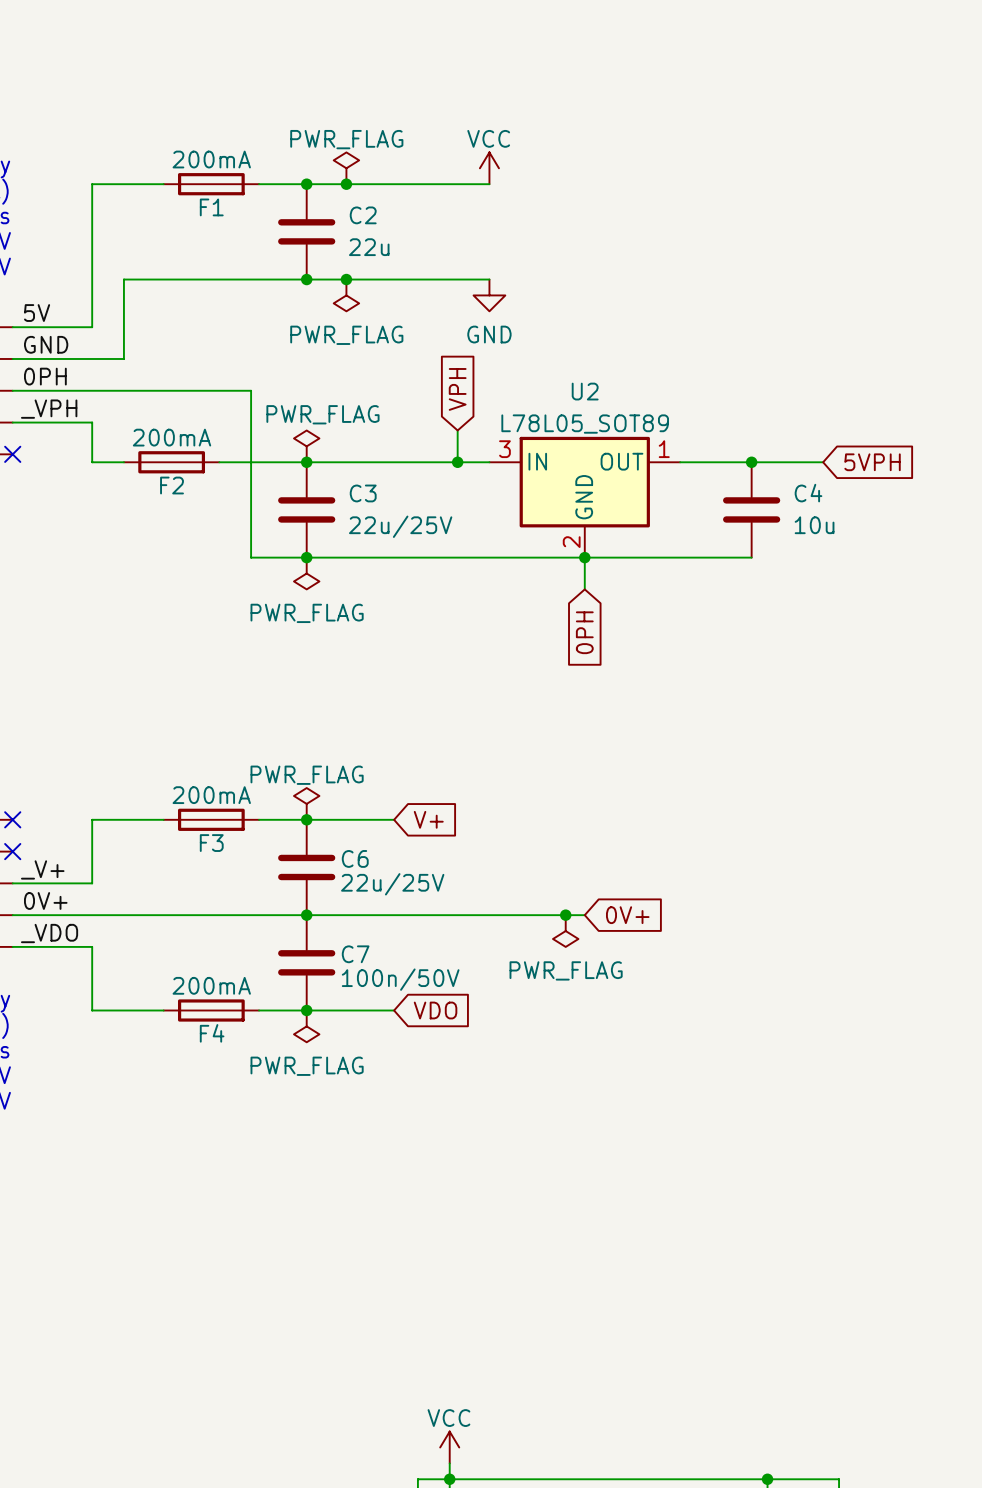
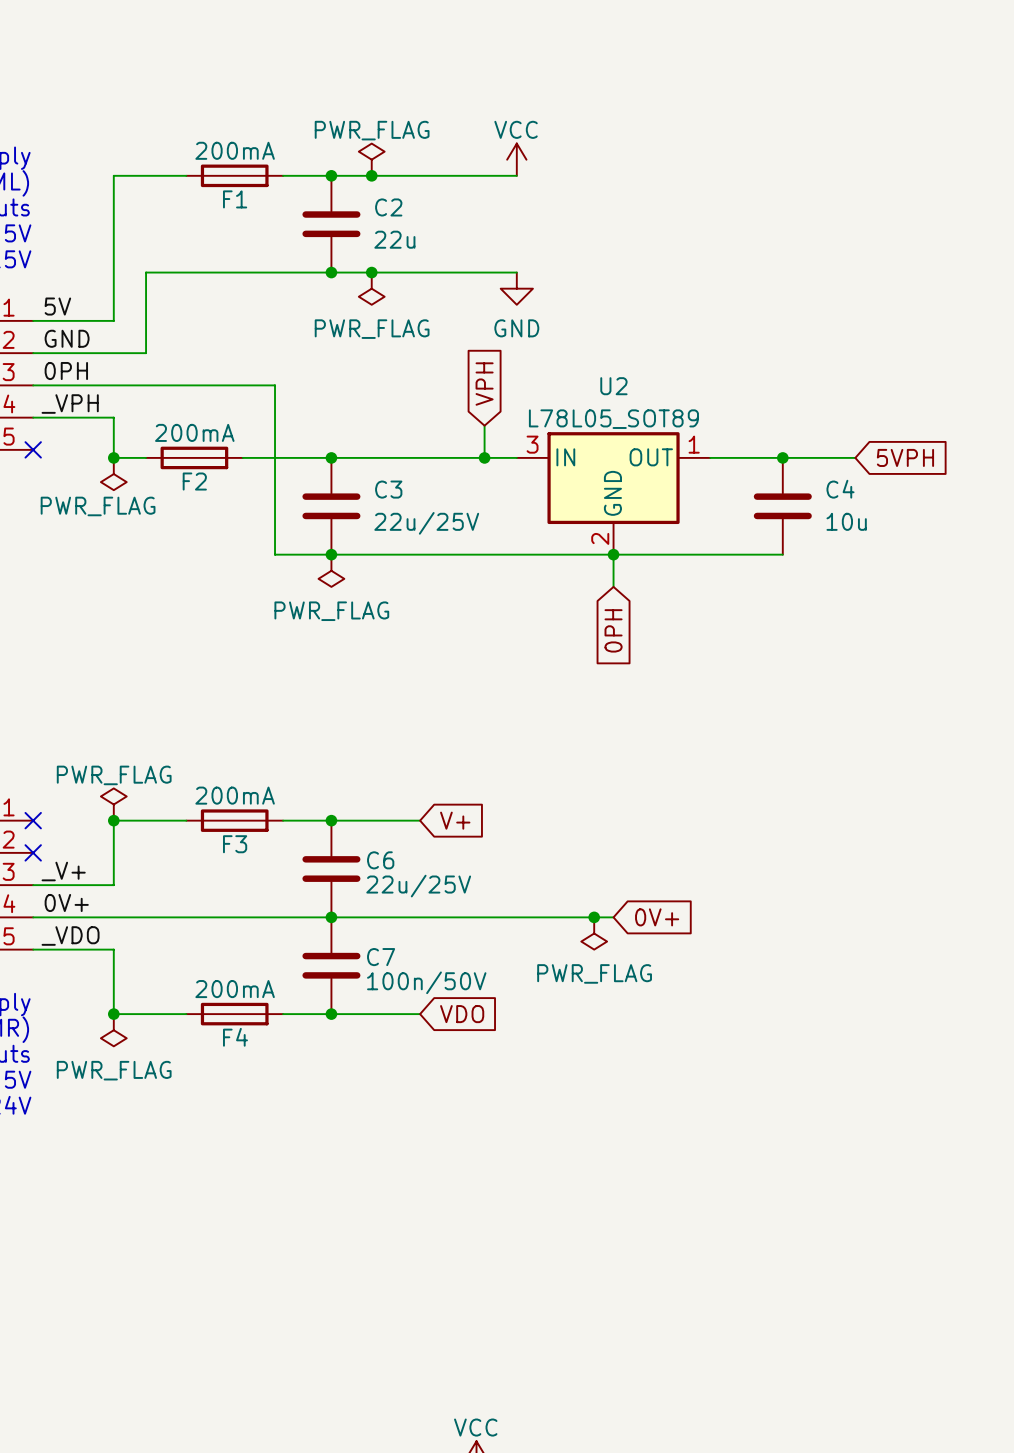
power symbol: PWR_FLAG (306, 446) -> none
junction: none -> (113, 457)
power symbol: none -> PWR_FLAG (113, 474)
power symbol: none -> PWR_FLAG (113, 804)
power symbol: PWR_FLAG (306, 803) -> none
junction: none -> (113, 820)
junction: none -> (113, 1014)
power symbol: none -> PWR_FLAG (113, 1030)
power symbol: PWR_FLAG (306, 1026) -> none

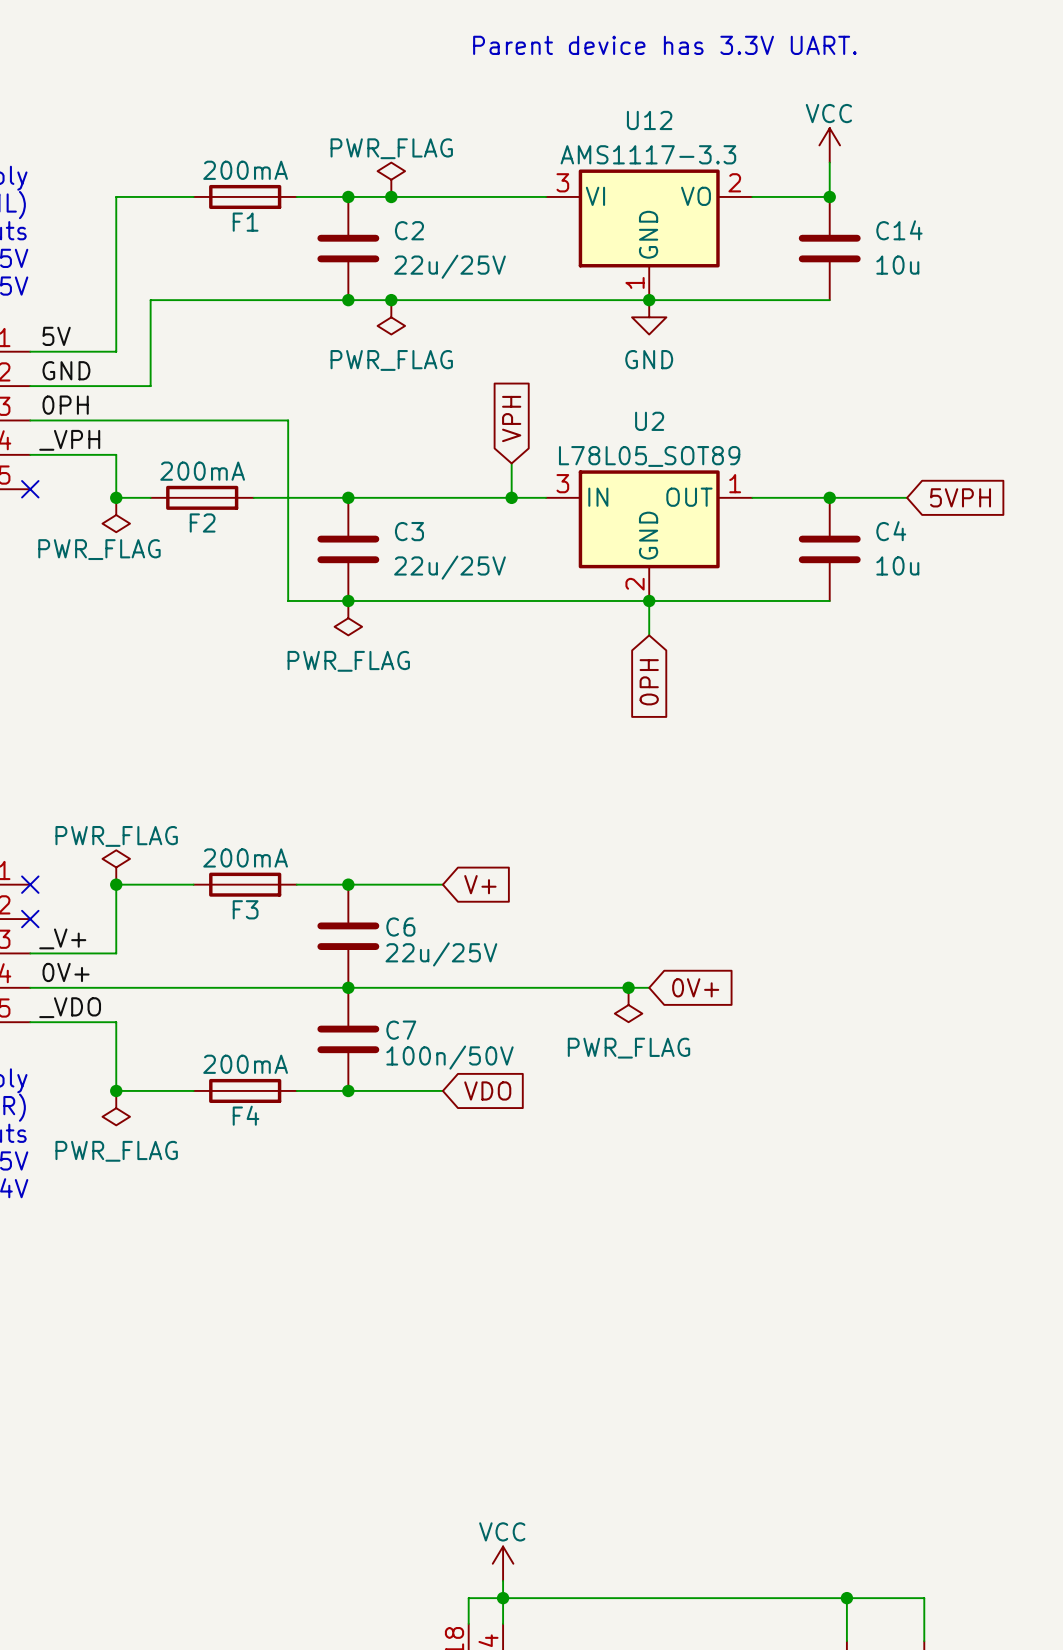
text: none -> Parent device has 3.3V UART. (664, 45)
wire: none -> (829, 162) (829, 196) (752, 196)
power symbol position: VCC (516, 159) -> VCC (829, 145)
junction: none -> (829, 196)
U12: none -> AMS1117-3.3 (649, 234)
C14: none -> 10u (829, 248)
C2 value: 22u (394, 239) -> 22u/25V (449, 266)
wire: none -> (546, 300) (829, 300)
junction: none -> (649, 300)
power symbol position: GND (516, 288) -> GND (649, 317)

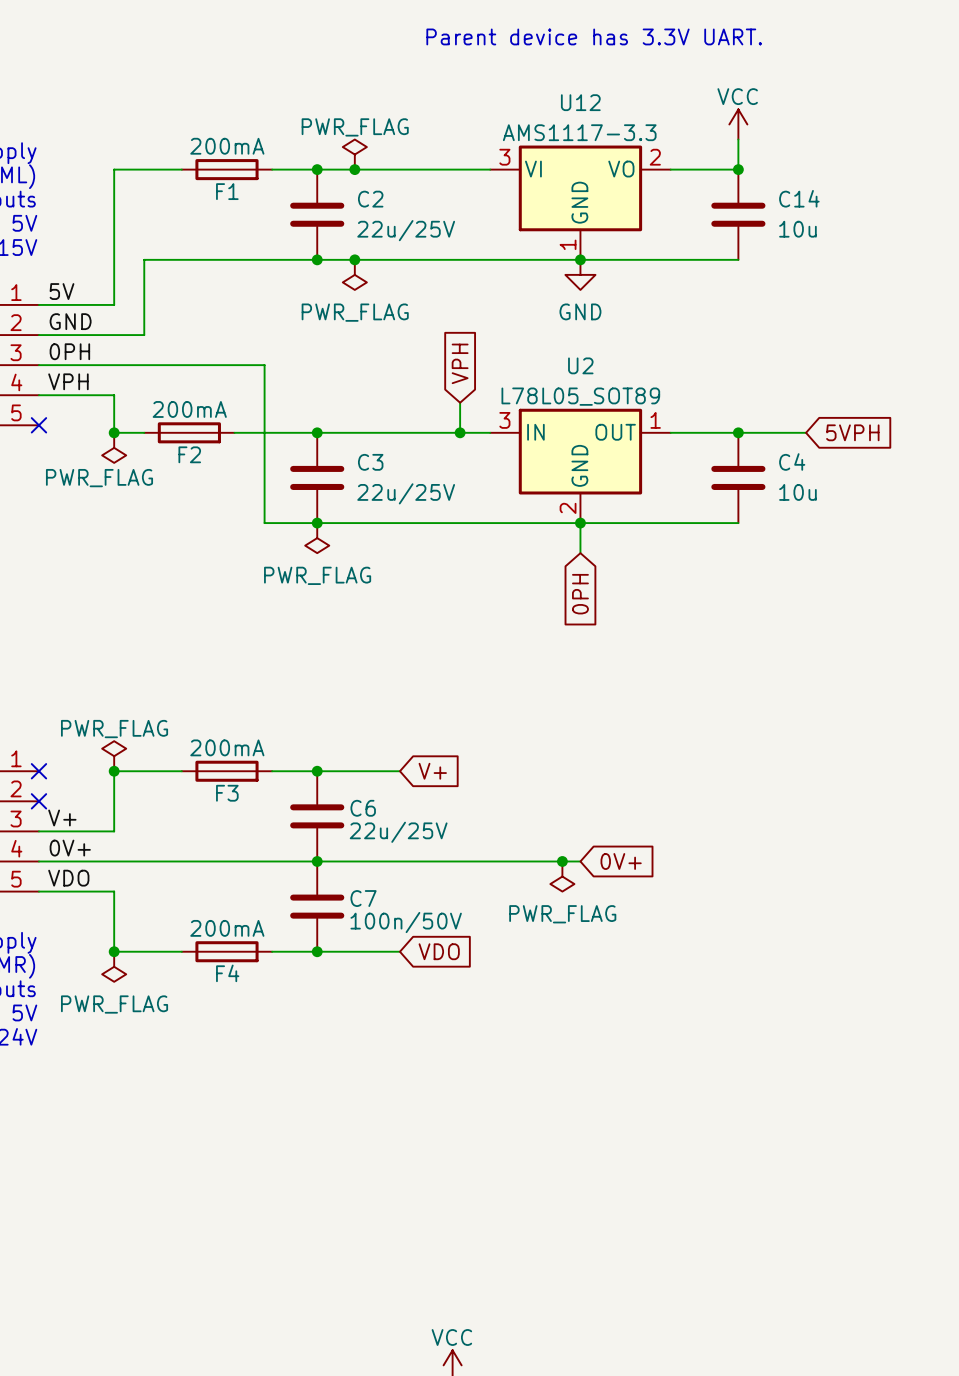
label: _VPH (69, 440) -> VPH (68, 381)
label: _V+ (62, 938) -> V+ (62, 817)
label: _VDO (70, 1007) -> VDO (68, 878)

